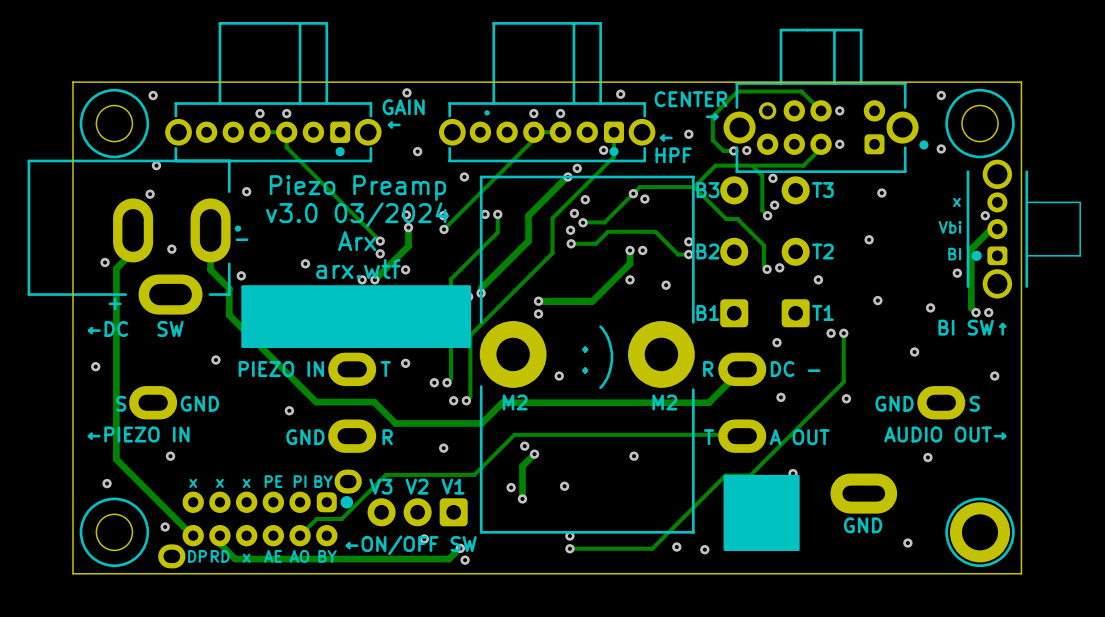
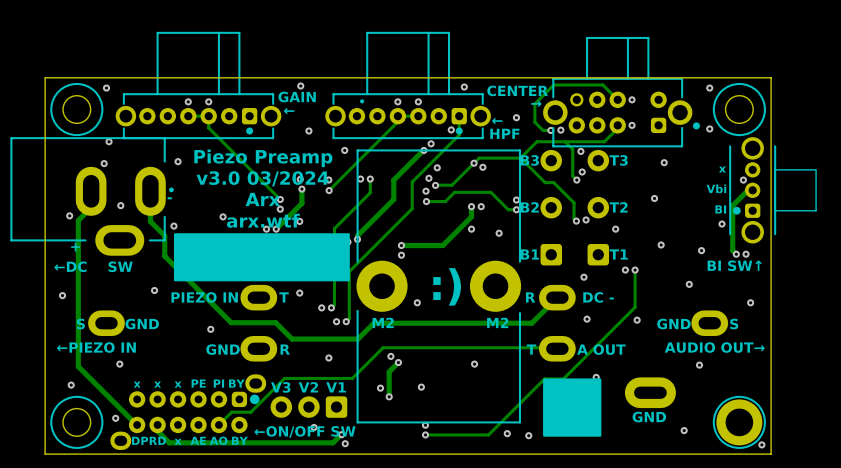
via: none -> (761, 444)

